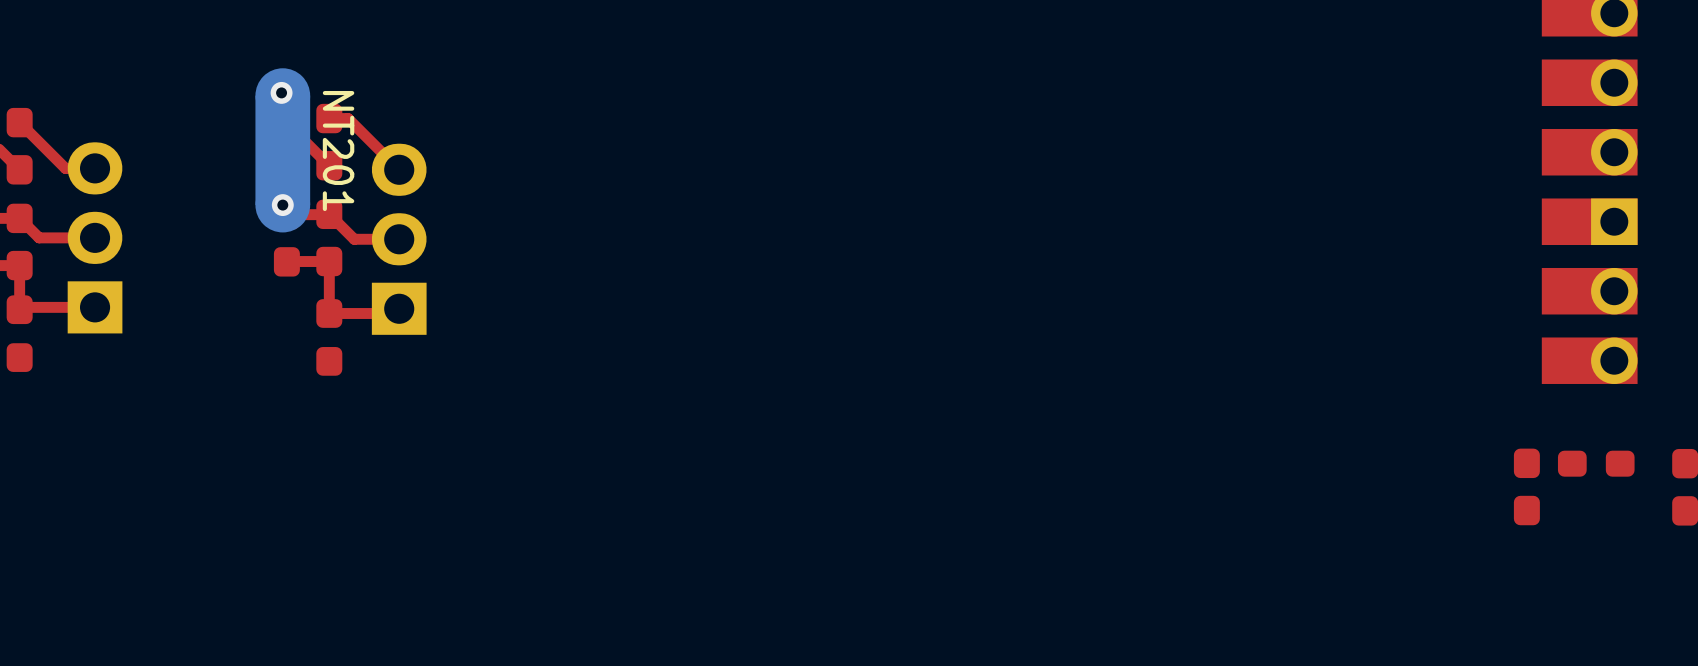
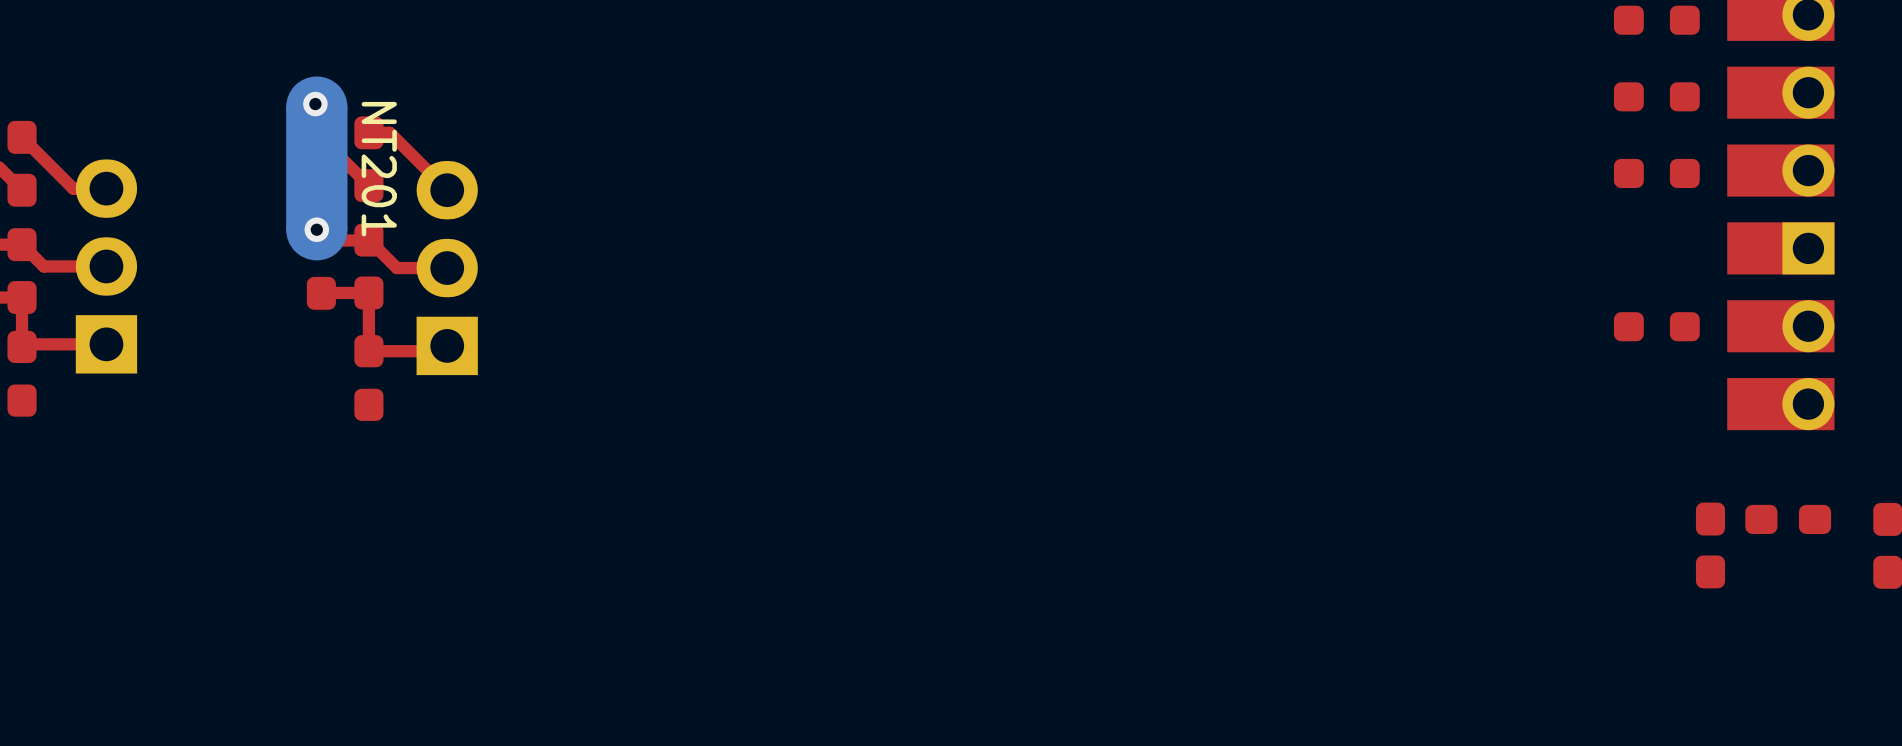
part: none -> (1656, 20)
part: none -> (1656, 96)
part: none -> (1656, 173)
part: none -> (1656, 326)

